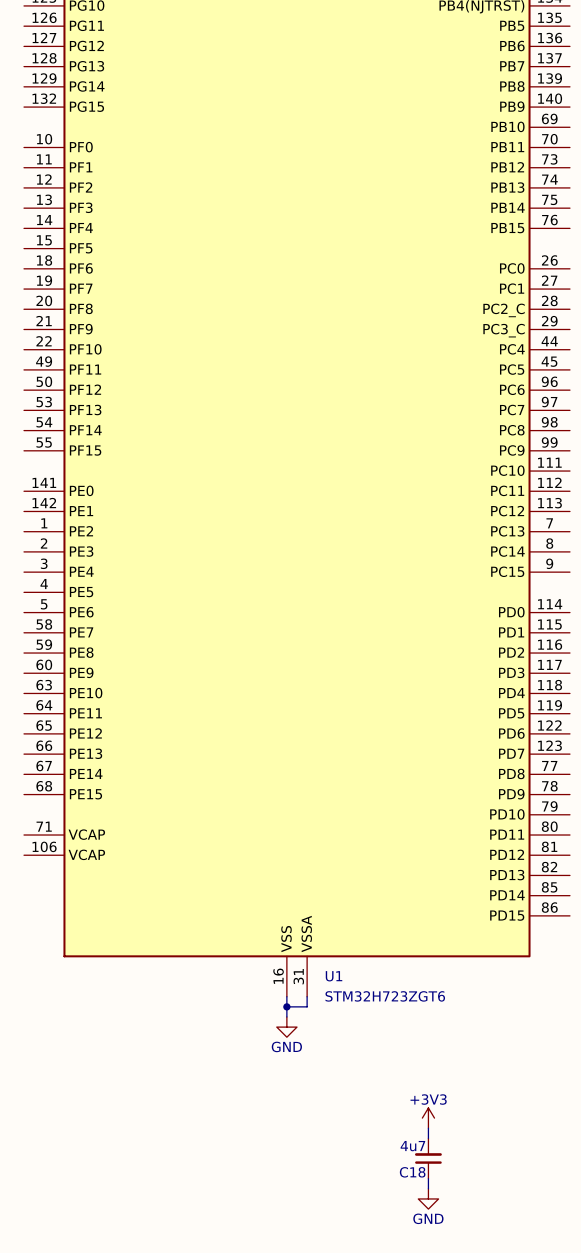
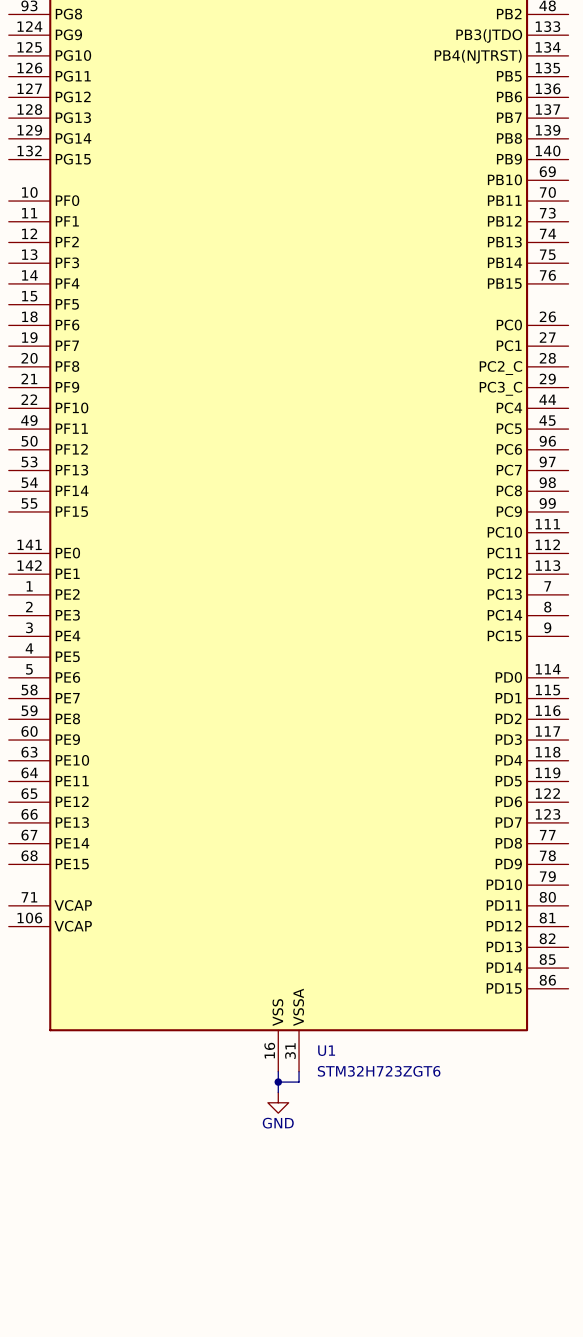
power symbol: +3V3 (428, 1118) -> none
wire: (428, 1128) (428, 1138) -> none
C18: 4u7 (428, 1158) -> none
wire: (428, 1178) (428, 1188) -> none
power symbol: GND (428, 1198) -> none

